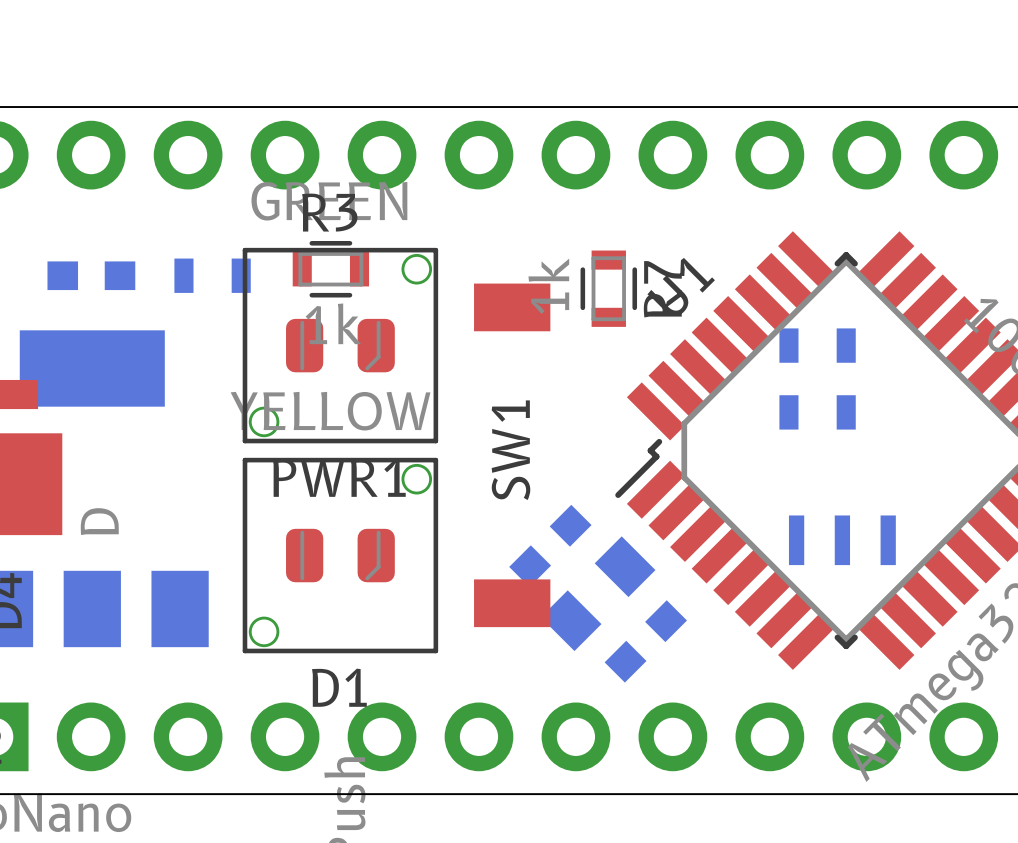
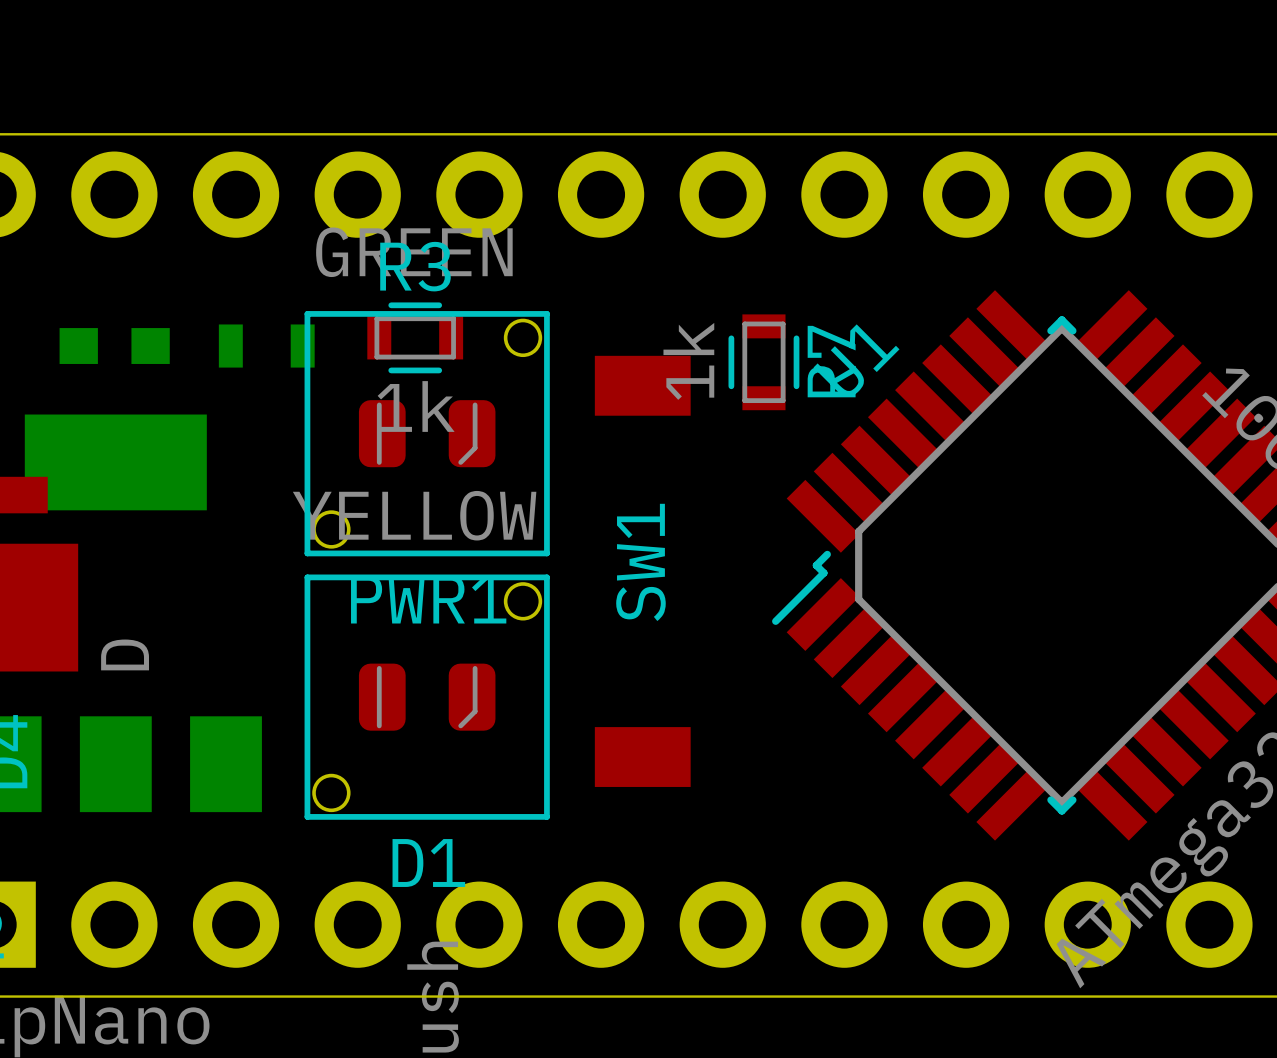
part: (817, 345) -> none
part: (817, 412) -> none
part: (842, 540) -> none
part: (550, 546) -> none
part: (598, 593) -> none
part: (645, 641) -> none

